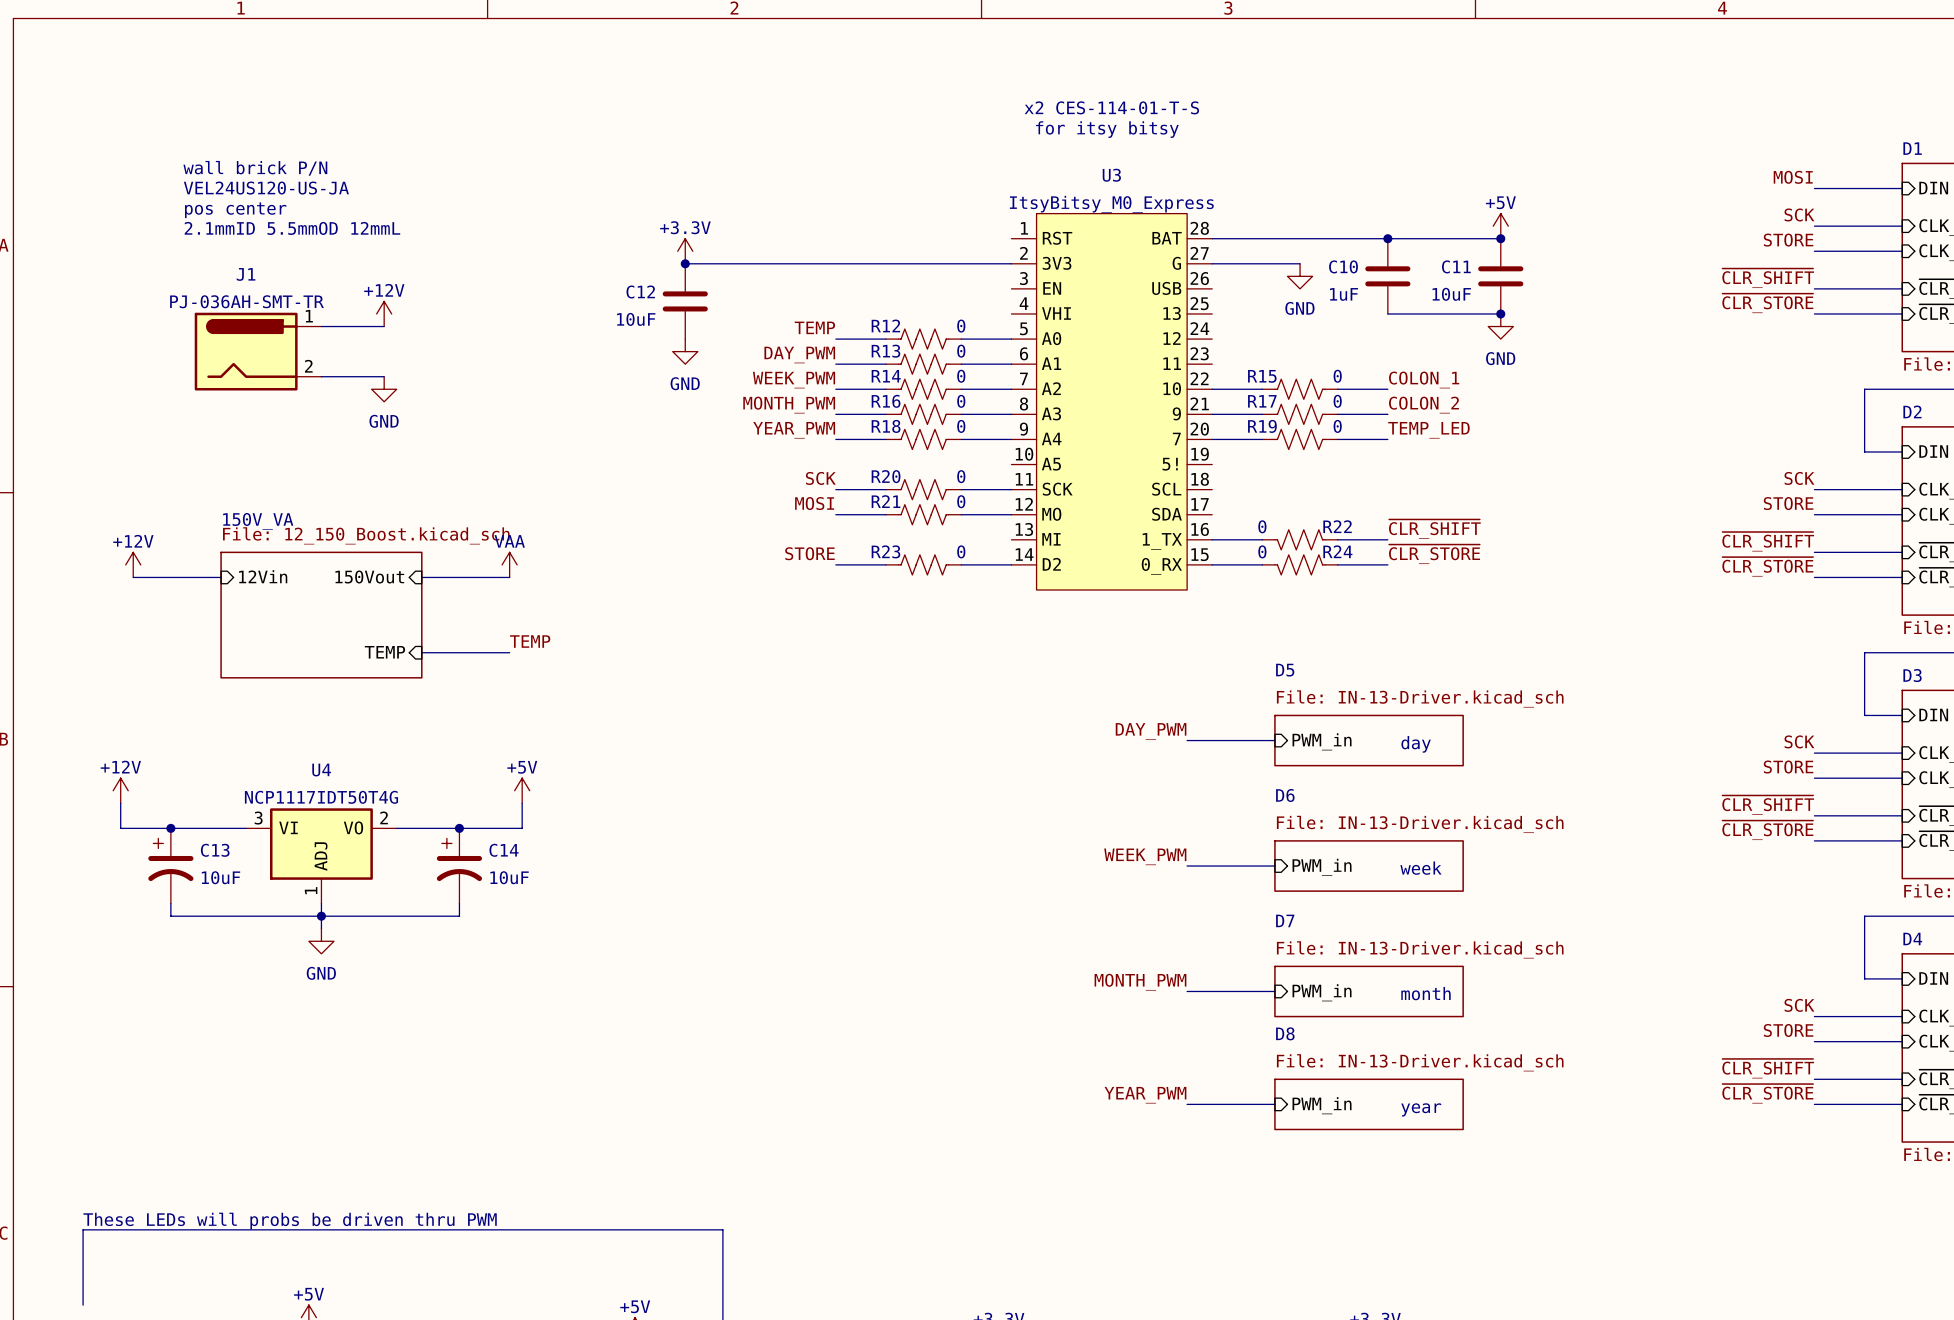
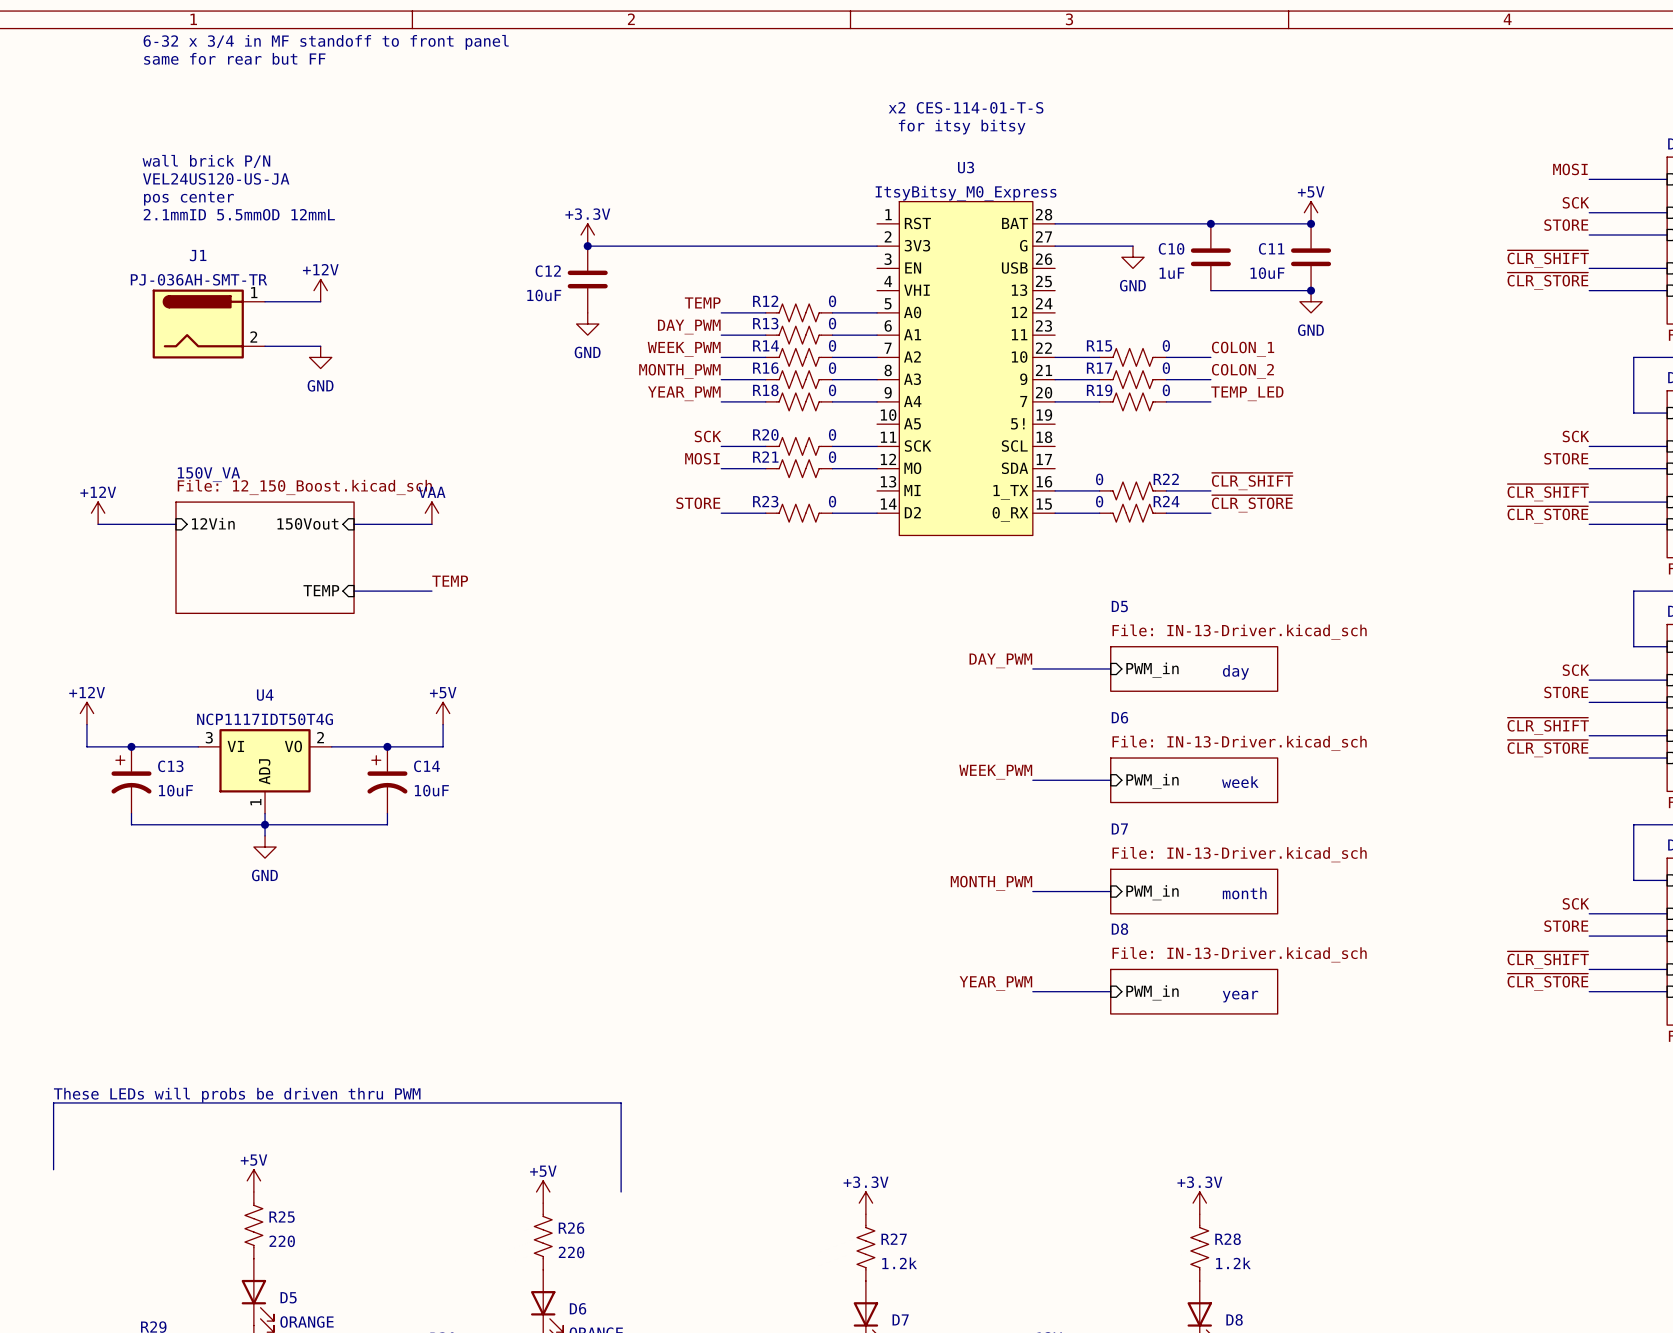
text: none -> 6-32 x 3/4 in MF standoff to front panel (326, 42)
text: none -> same for rear but FF (234, 58)

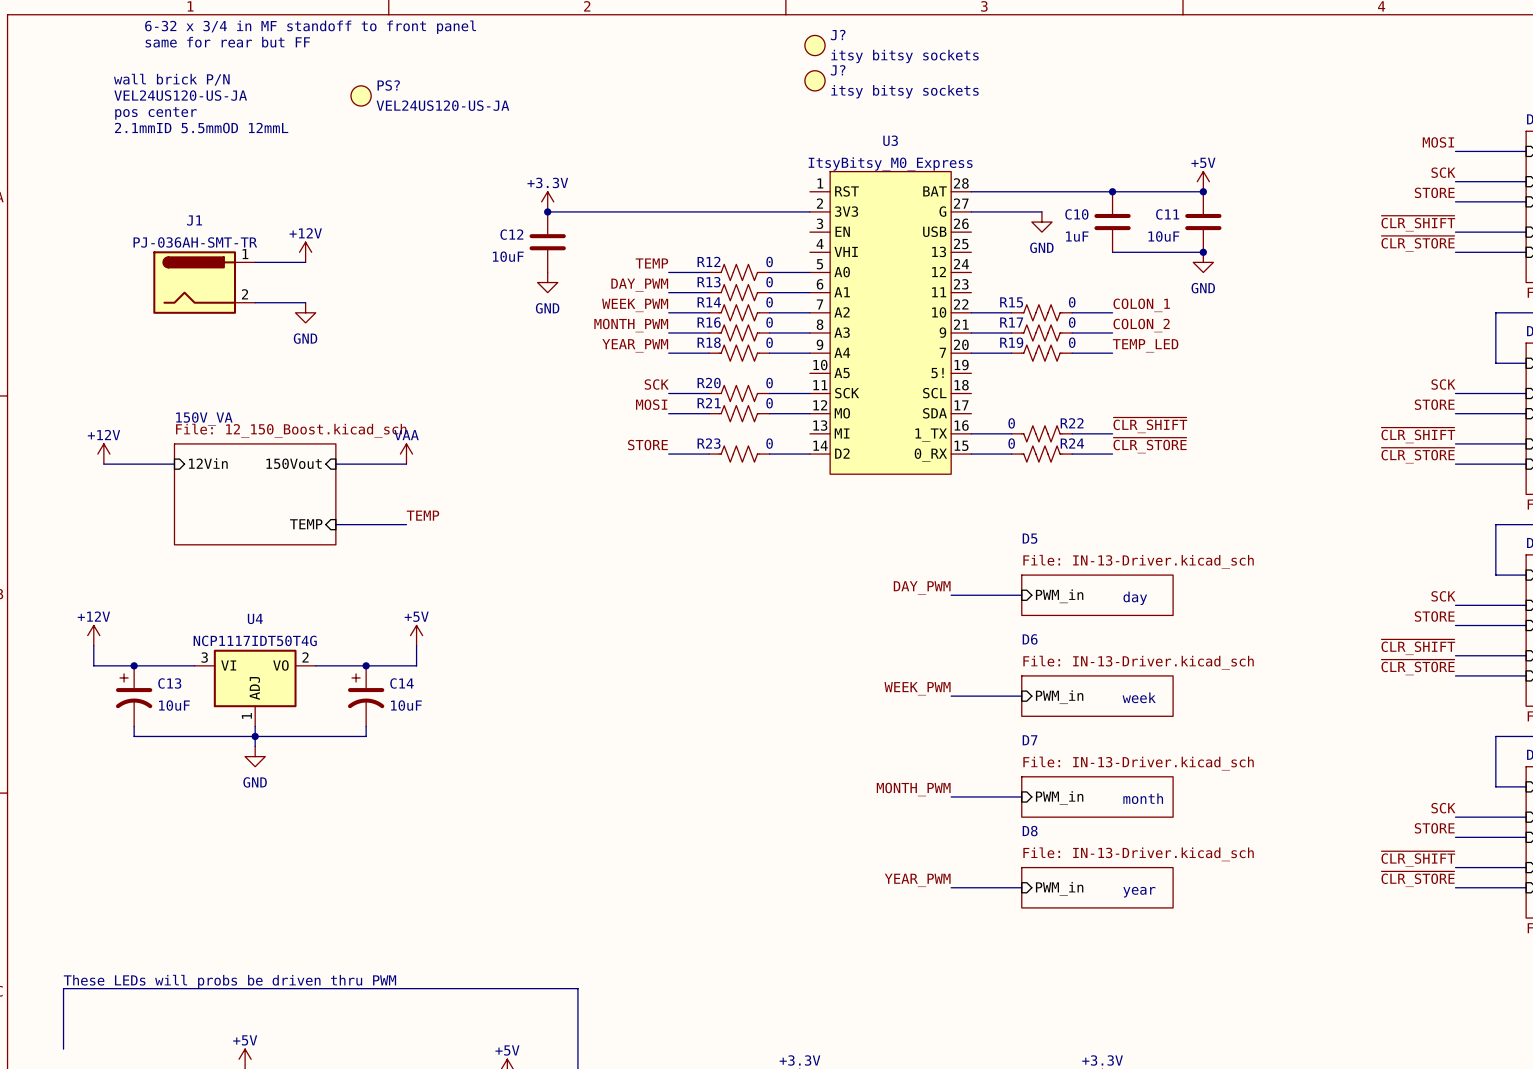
J?: none -> itsy bitsy sockets (814, 45)
J?: none -> itsy bitsy sockets (814, 80)
text: x2 CES-114-01-T-S (966, 107) -> none
PS?: none -> VEL24US120-US-JA (361, 95)
text: for itsy bitsy (962, 127) -> none
text position: wall brick P/N (206, 161) -> wall brick P/N (171, 79)
text position: VEL24US120-US-JA (216, 178) -> VEL24US120-US-JA (180, 95)
text position: pos center (188, 198) -> pos center (155, 113)
text position: 2.1mmID 5.5mmOD 12mmL (239, 214) -> 2.1mmID 5.5mmOD 12mmL (201, 128)

